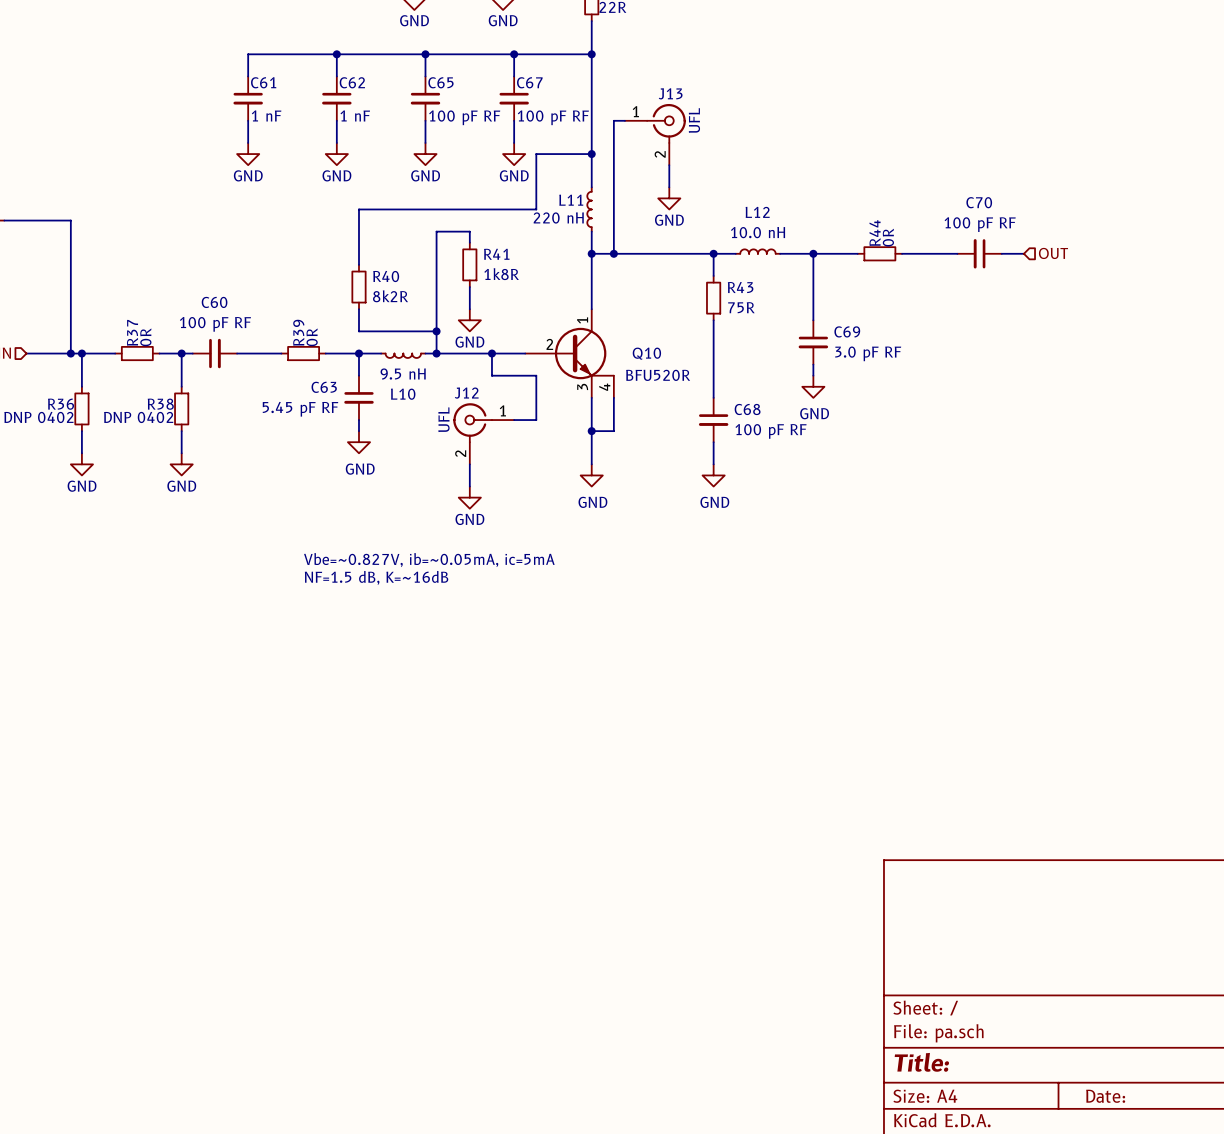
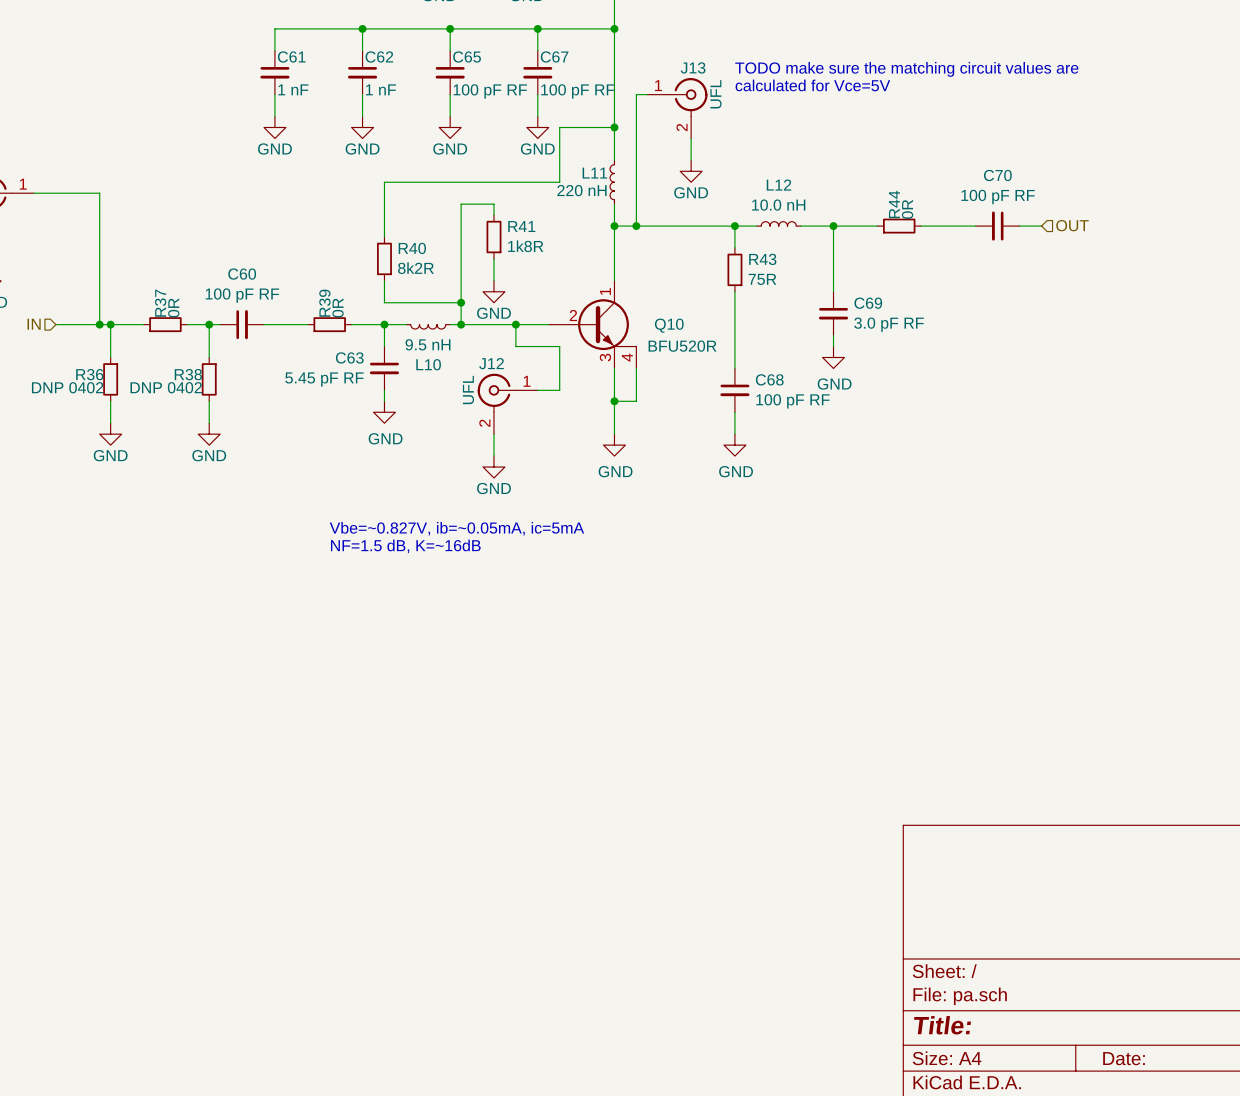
text: none -> TODO make sure the matching circuit values are (906, 69)
text: none -> calculated for Vce=5V (812, 85)

